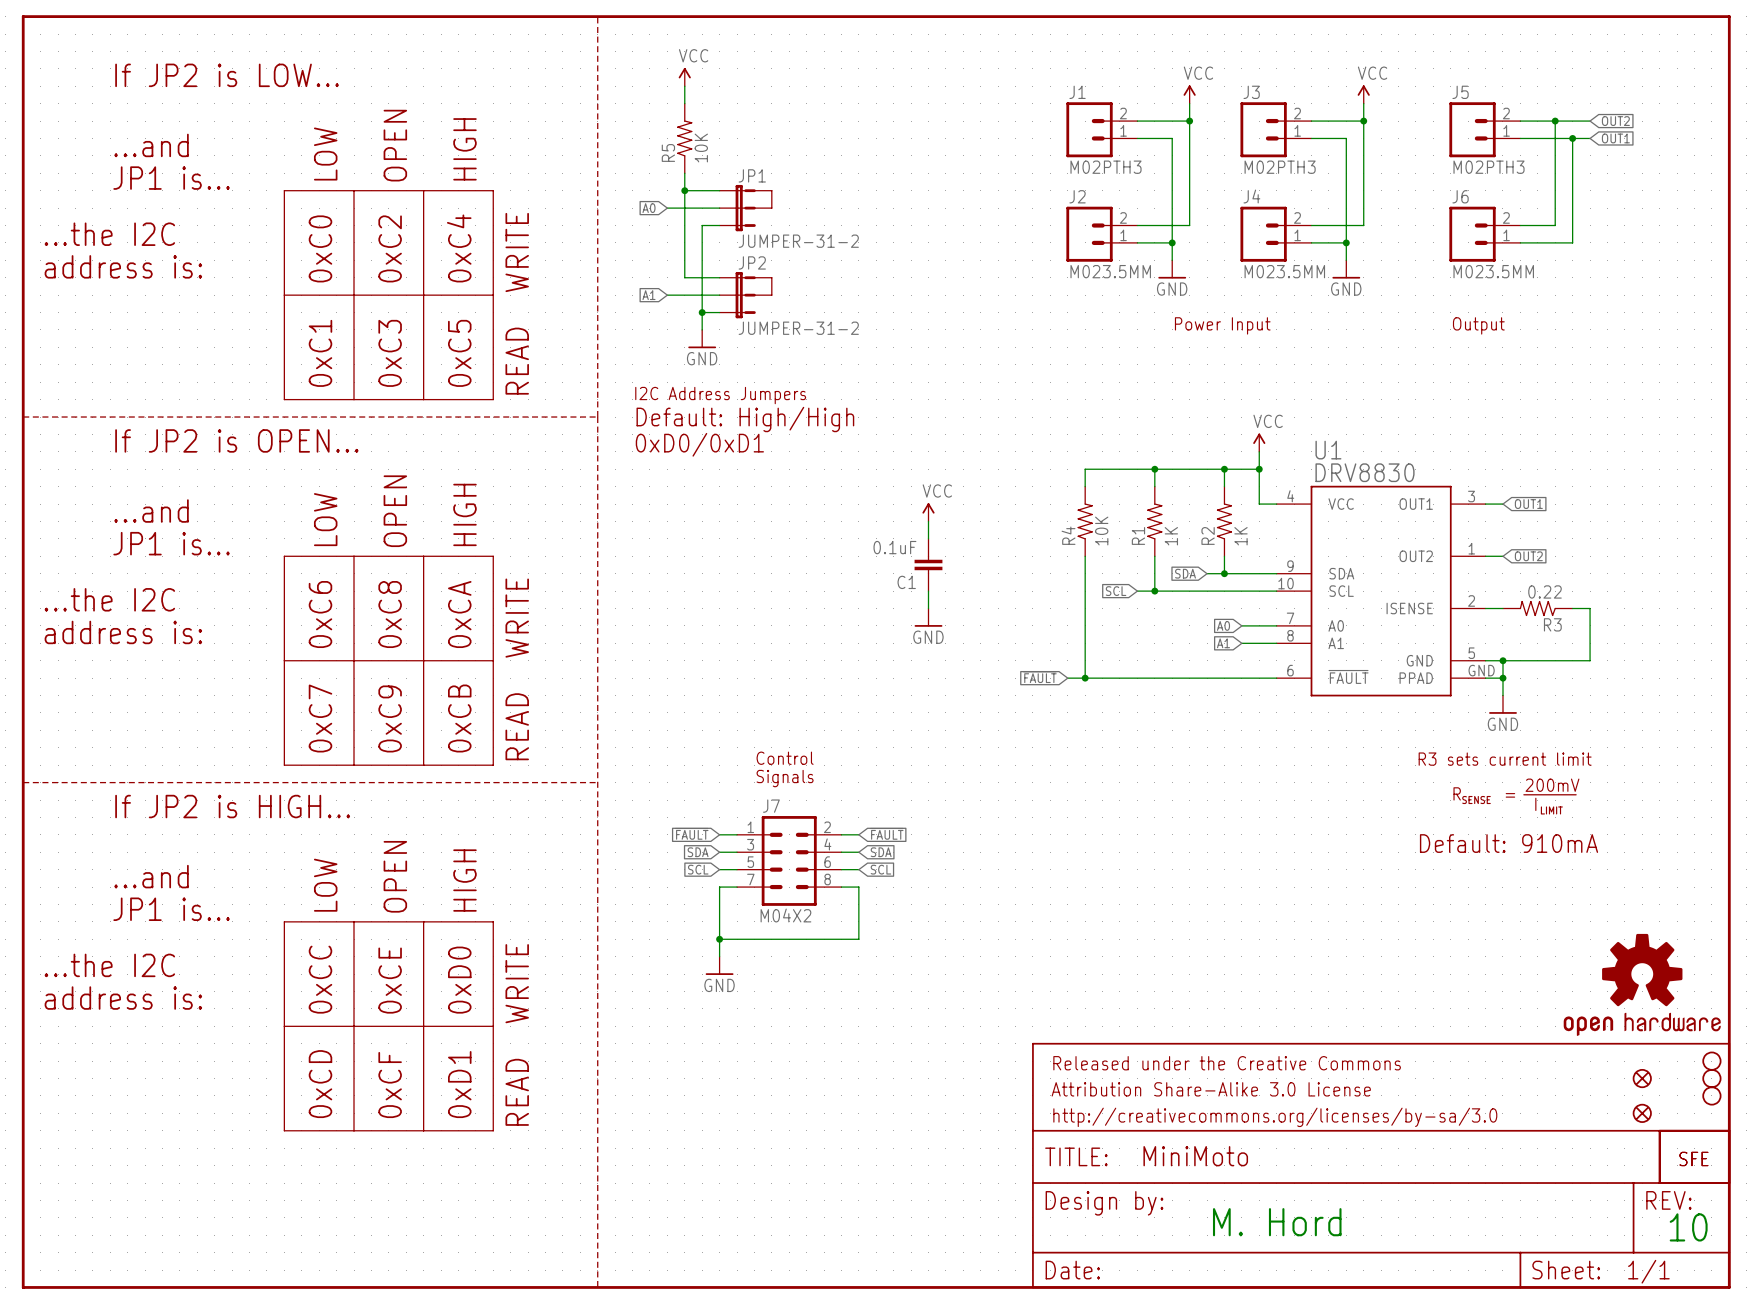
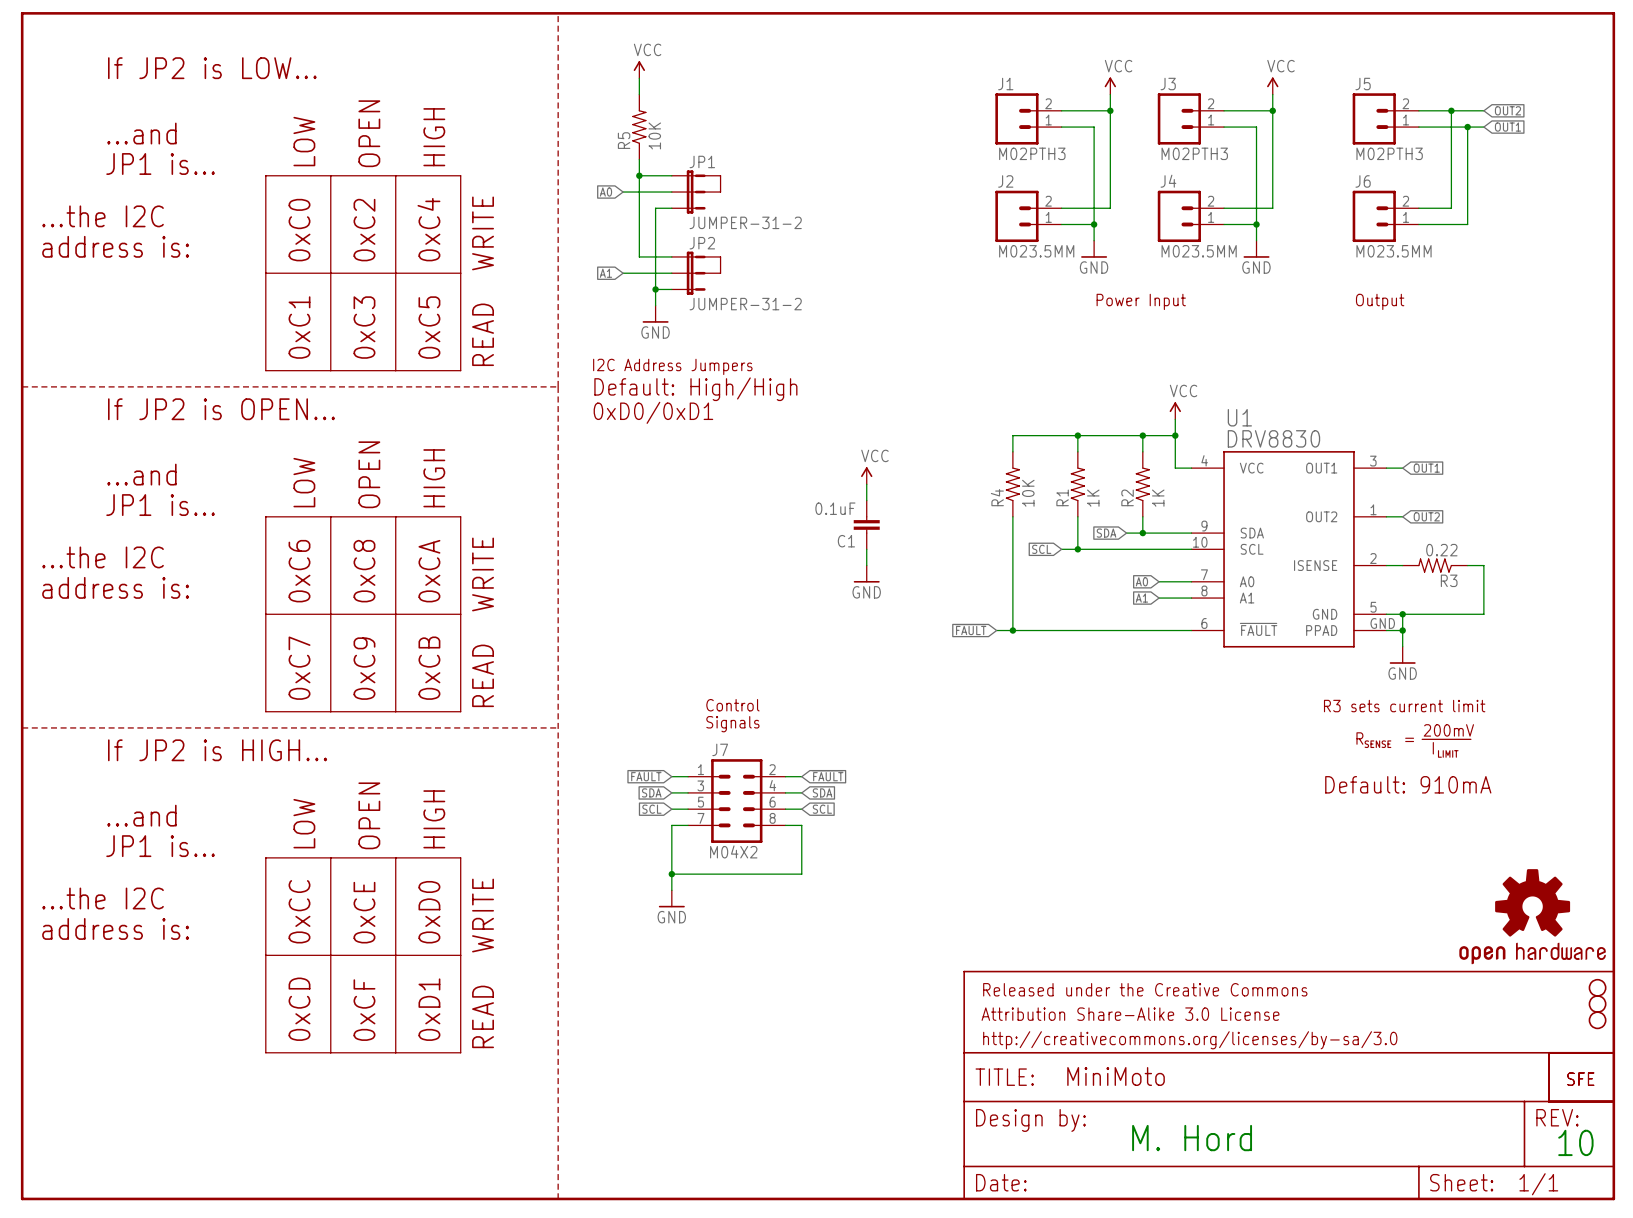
part: (1642, 1078) -> none
part: (1642, 1113) -> none

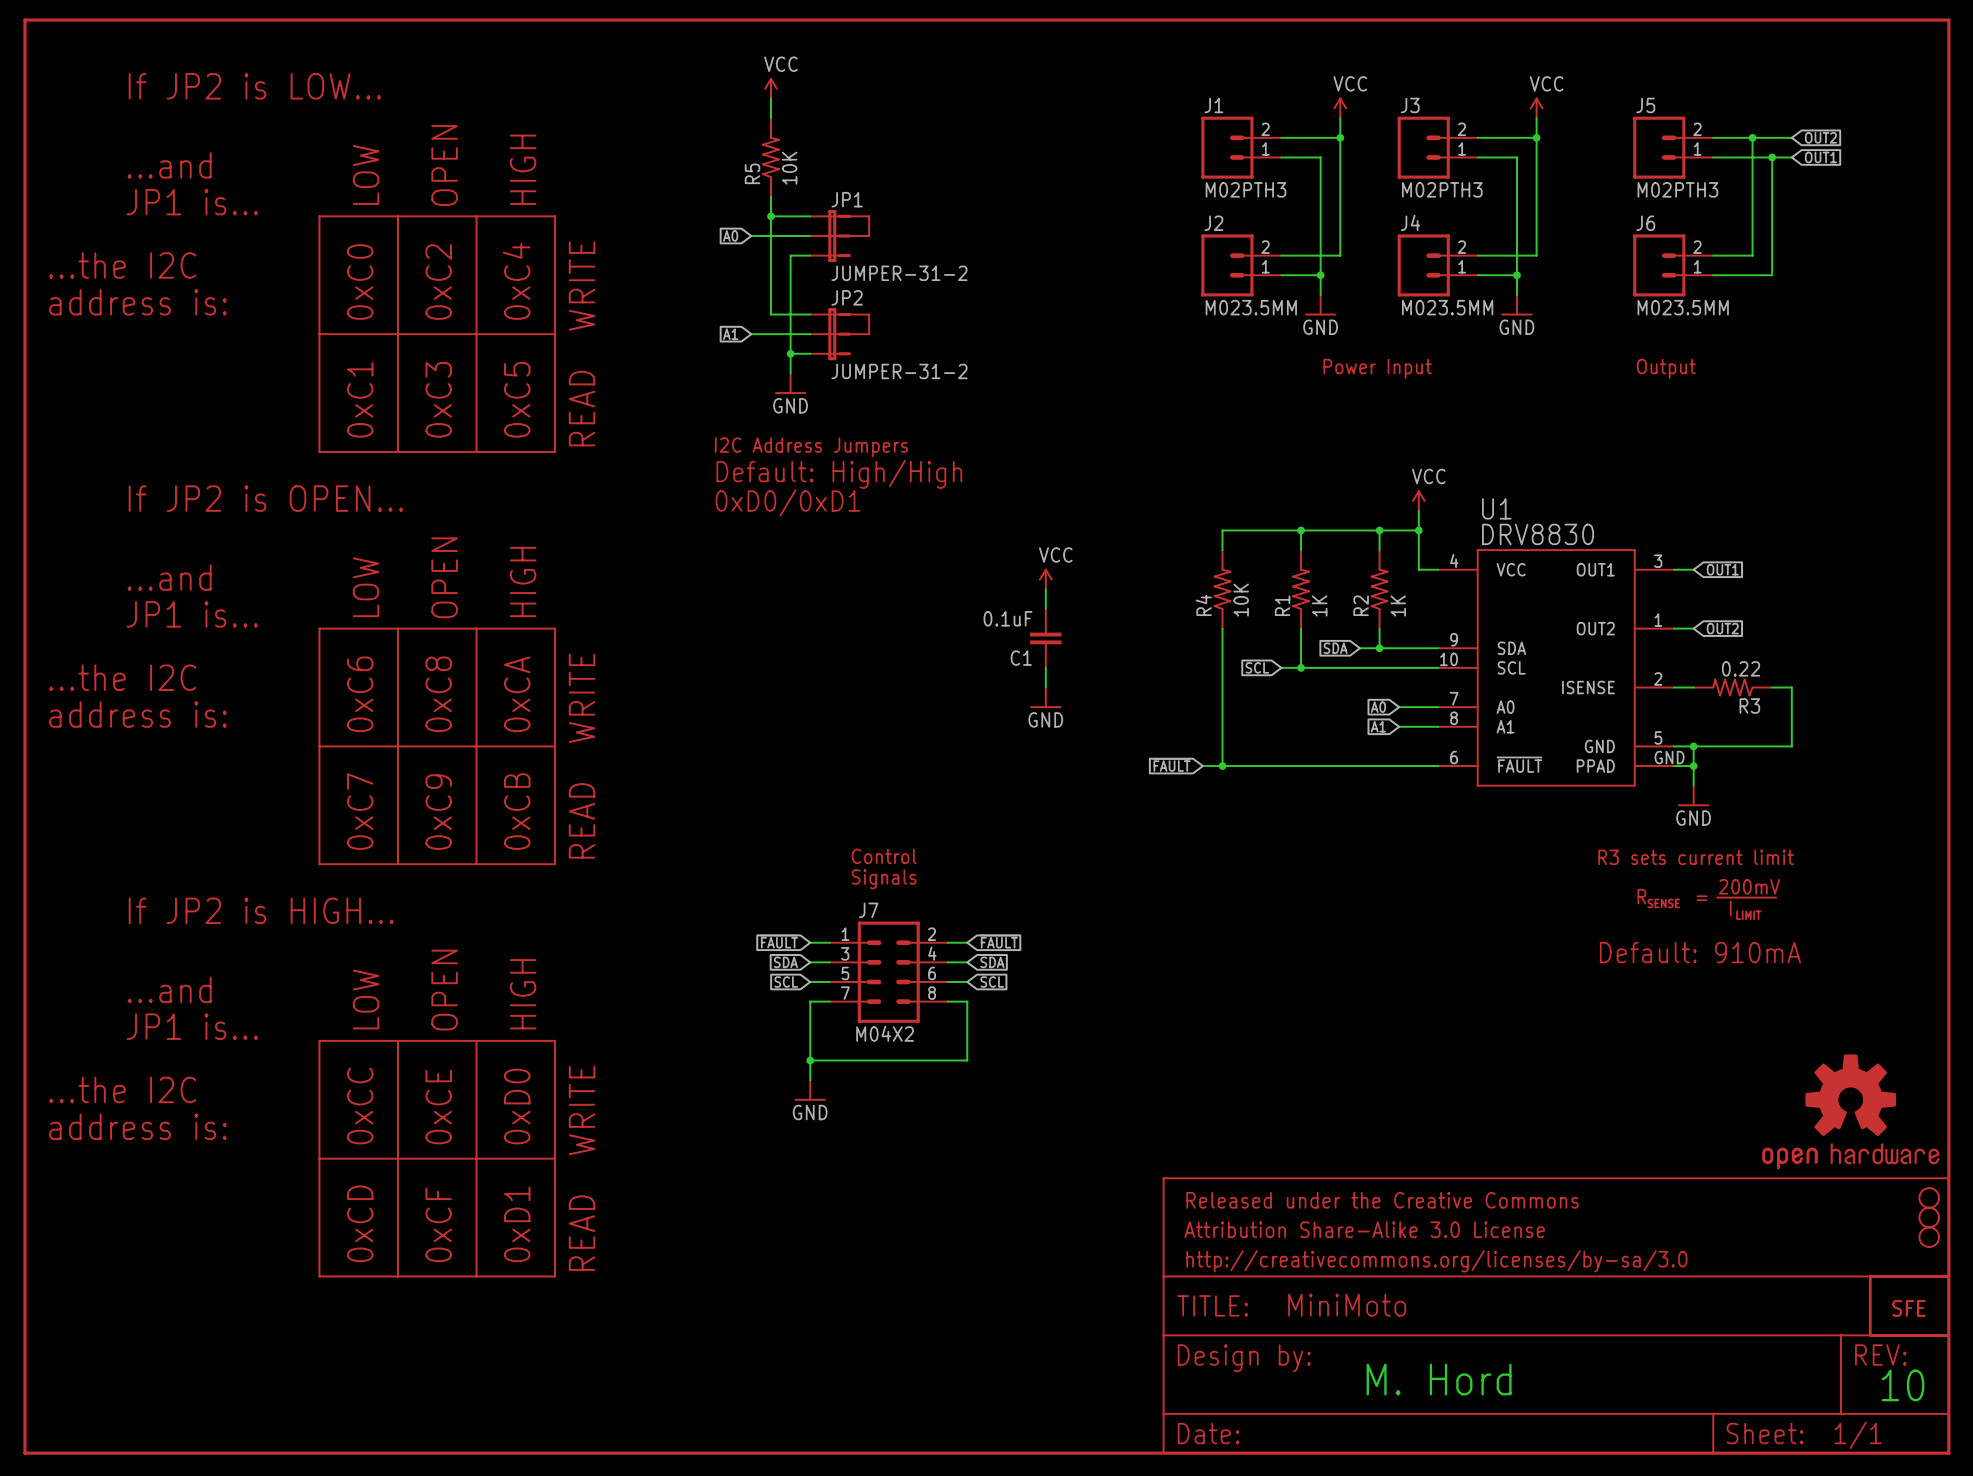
line: (558, 13) (558, 1198) -> none
line: (22, 386) (558, 386) -> none
line: (22, 727) (558, 727) -> none

